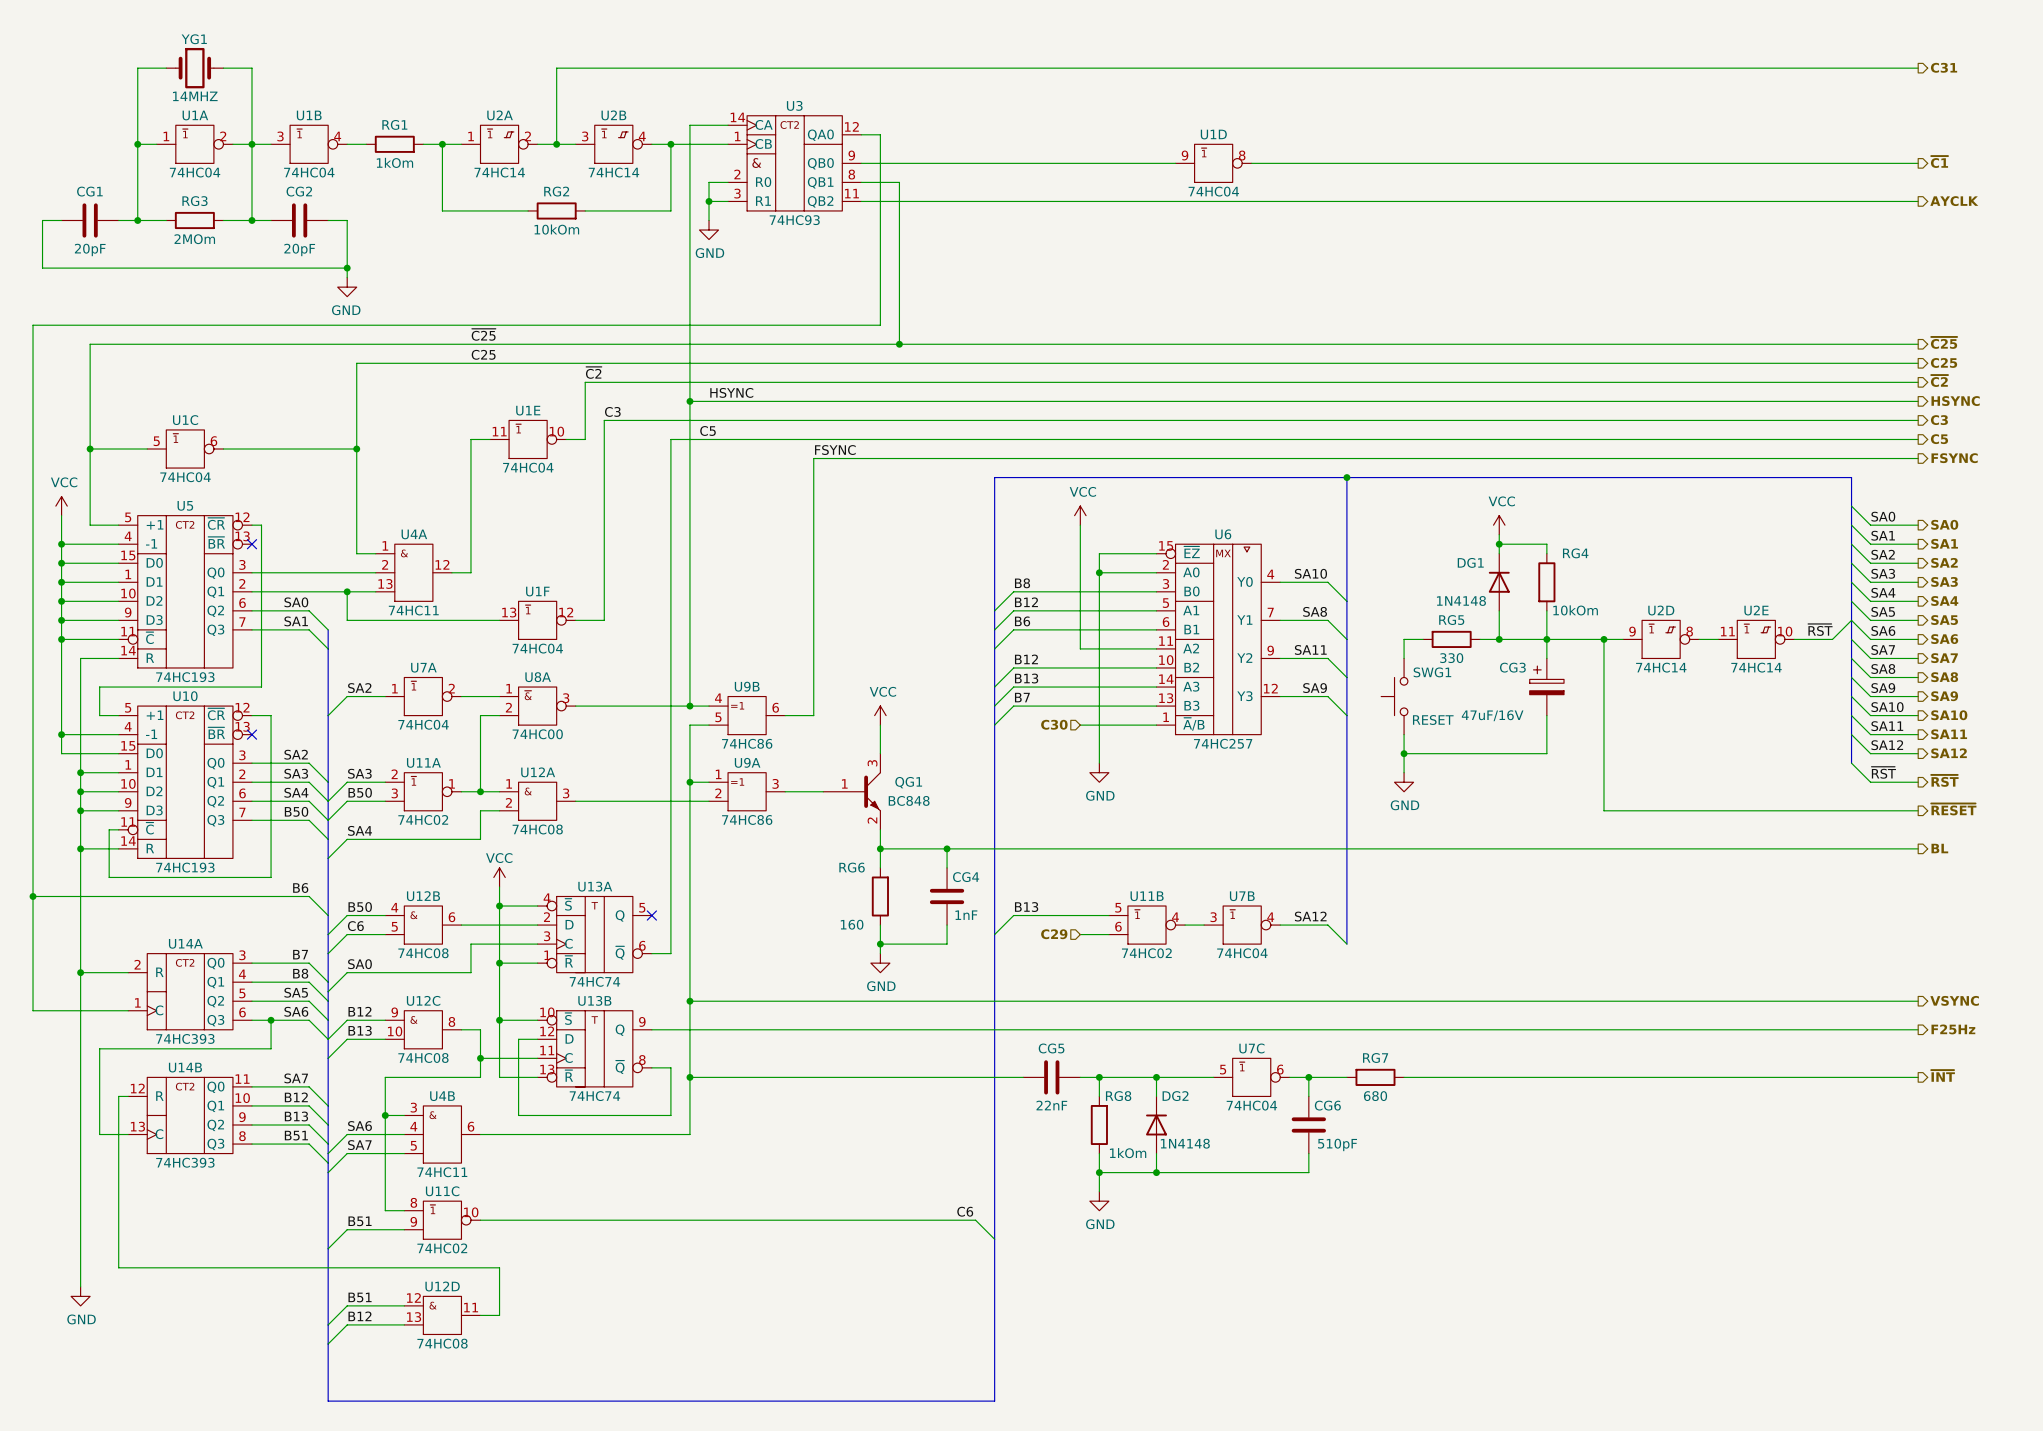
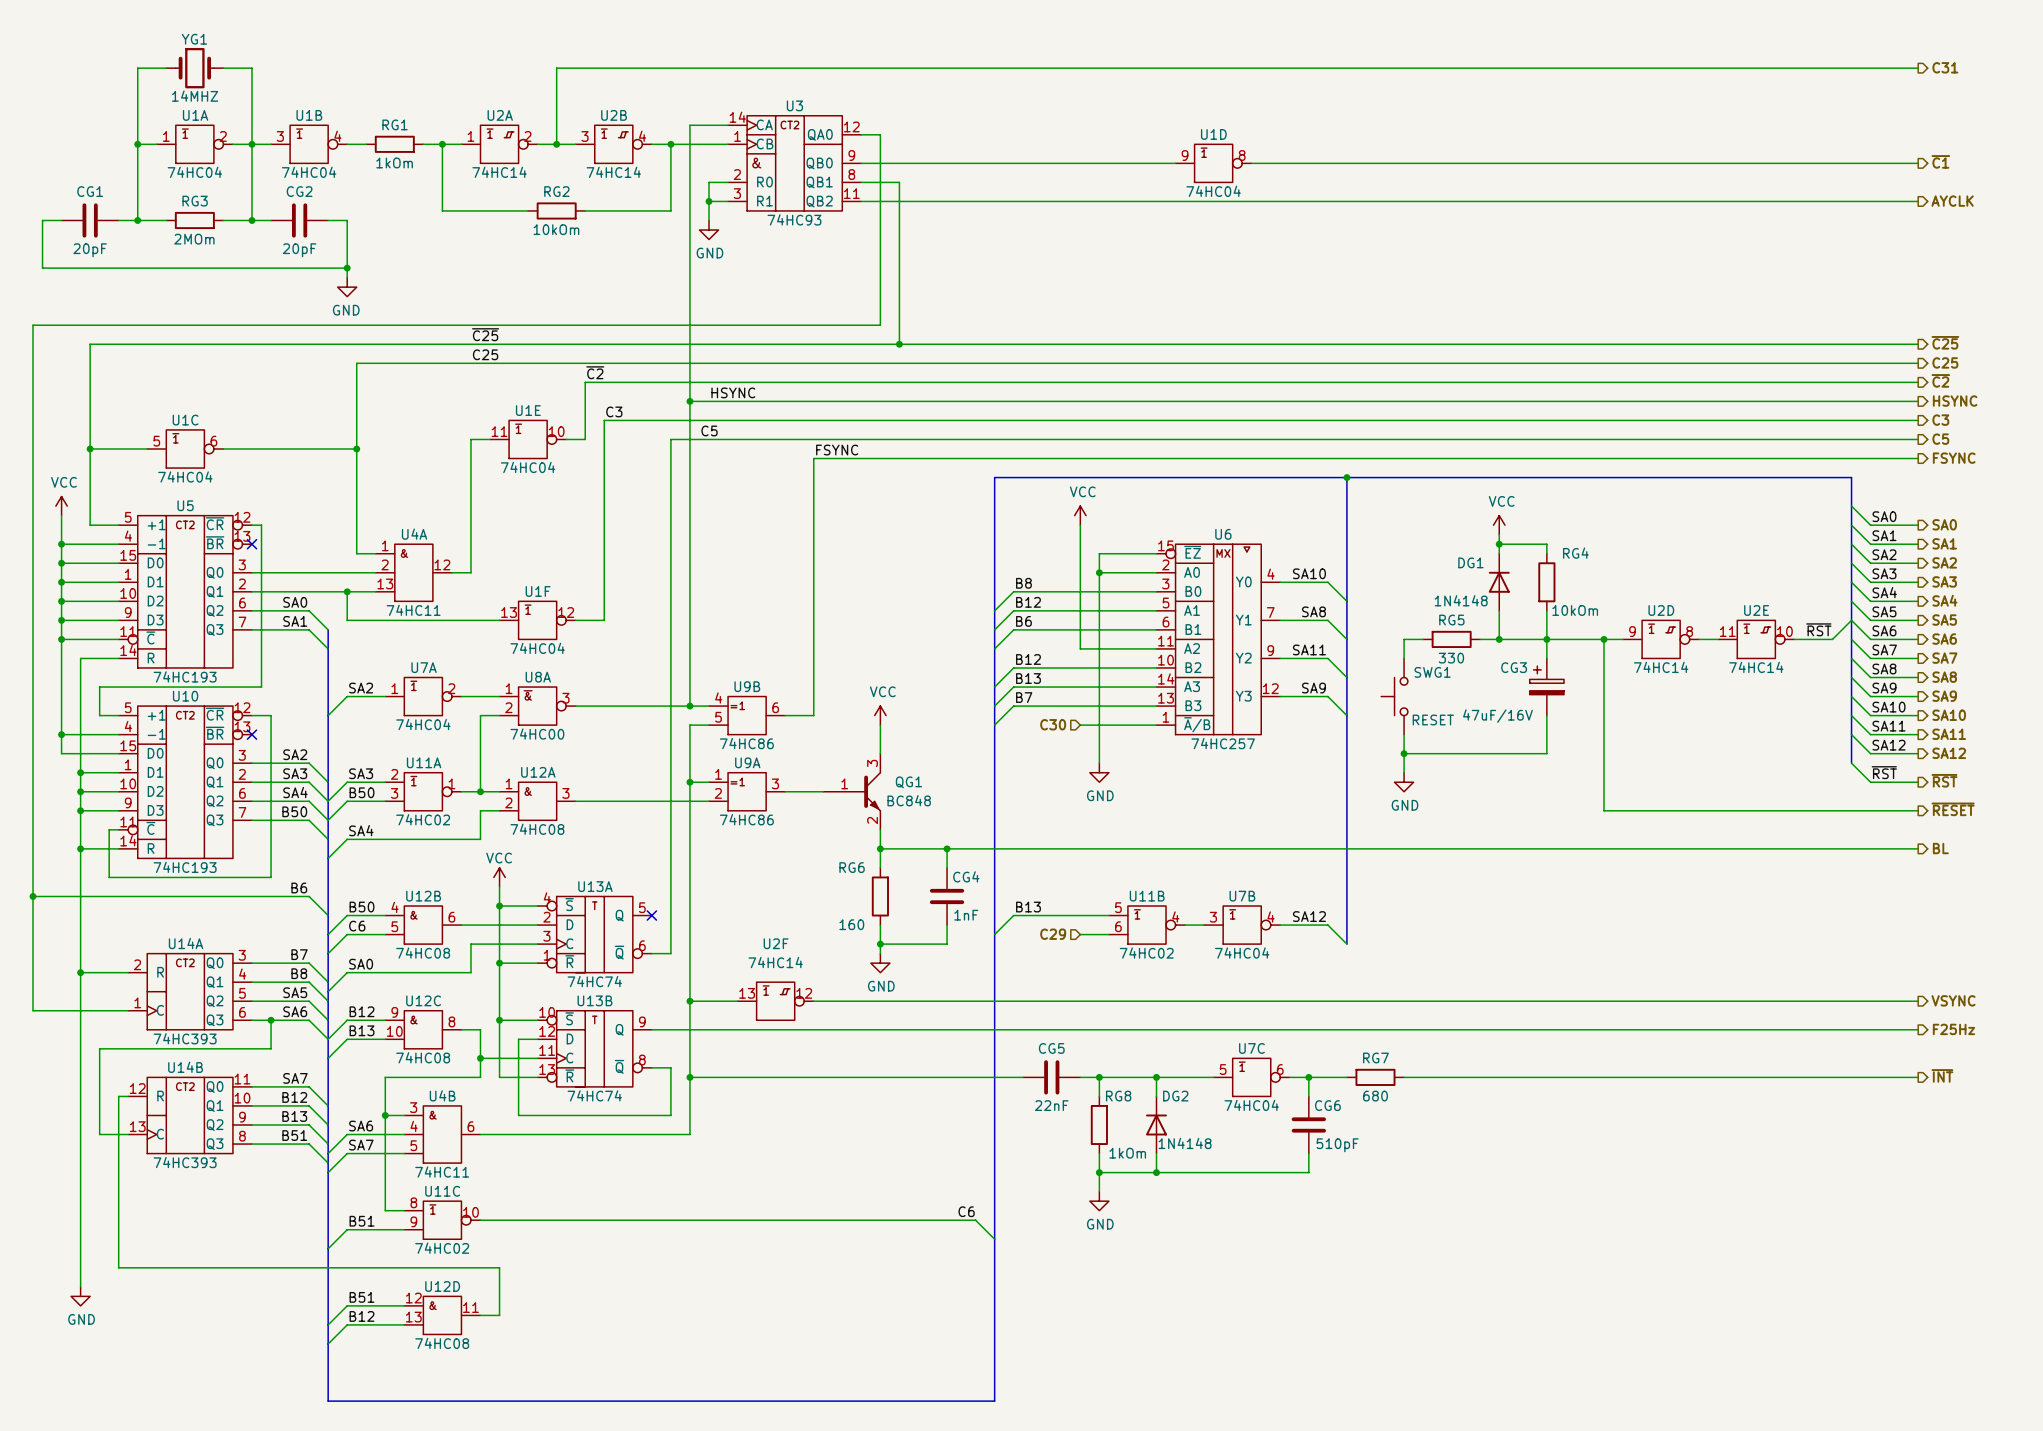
wire: (737, 1001) (813, 1001) -> none
U2F: none -> 74HC14 (775, 1001)

